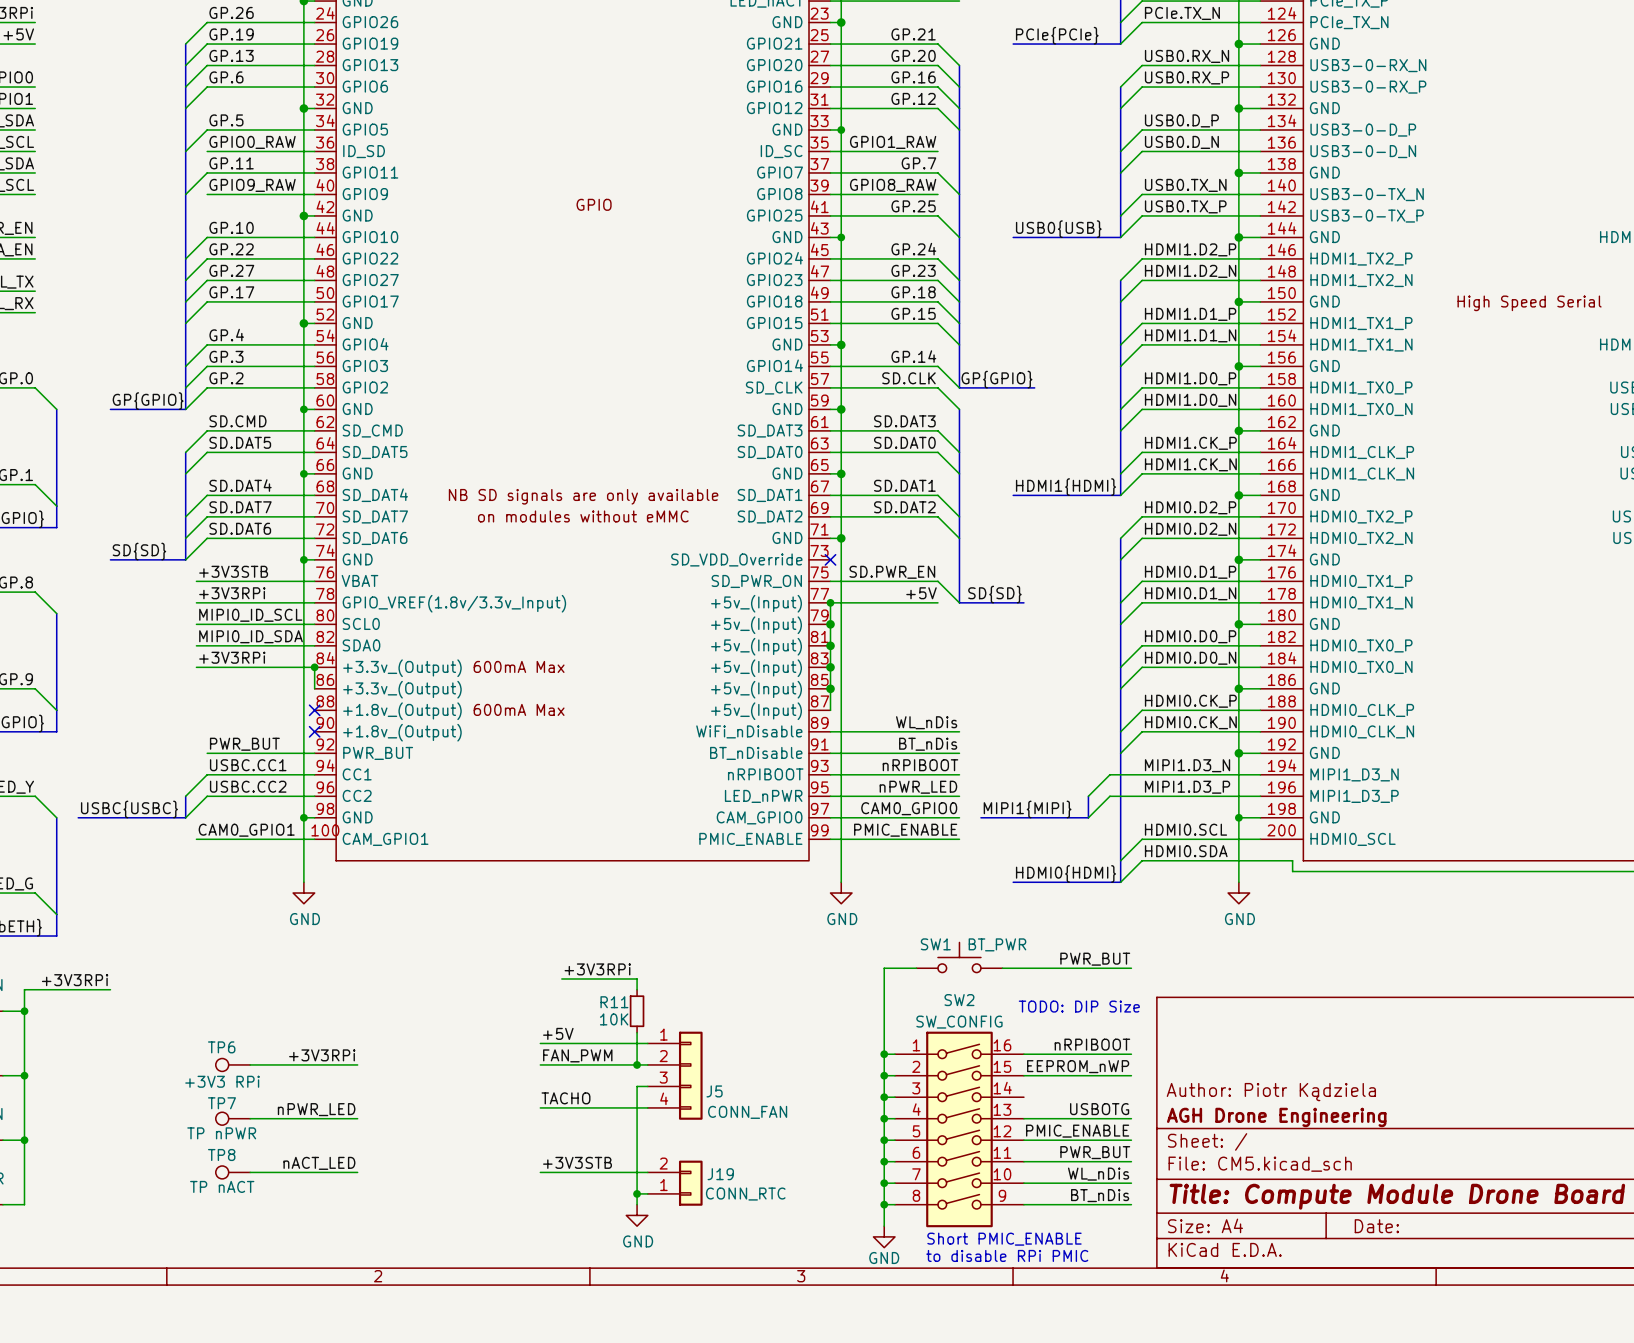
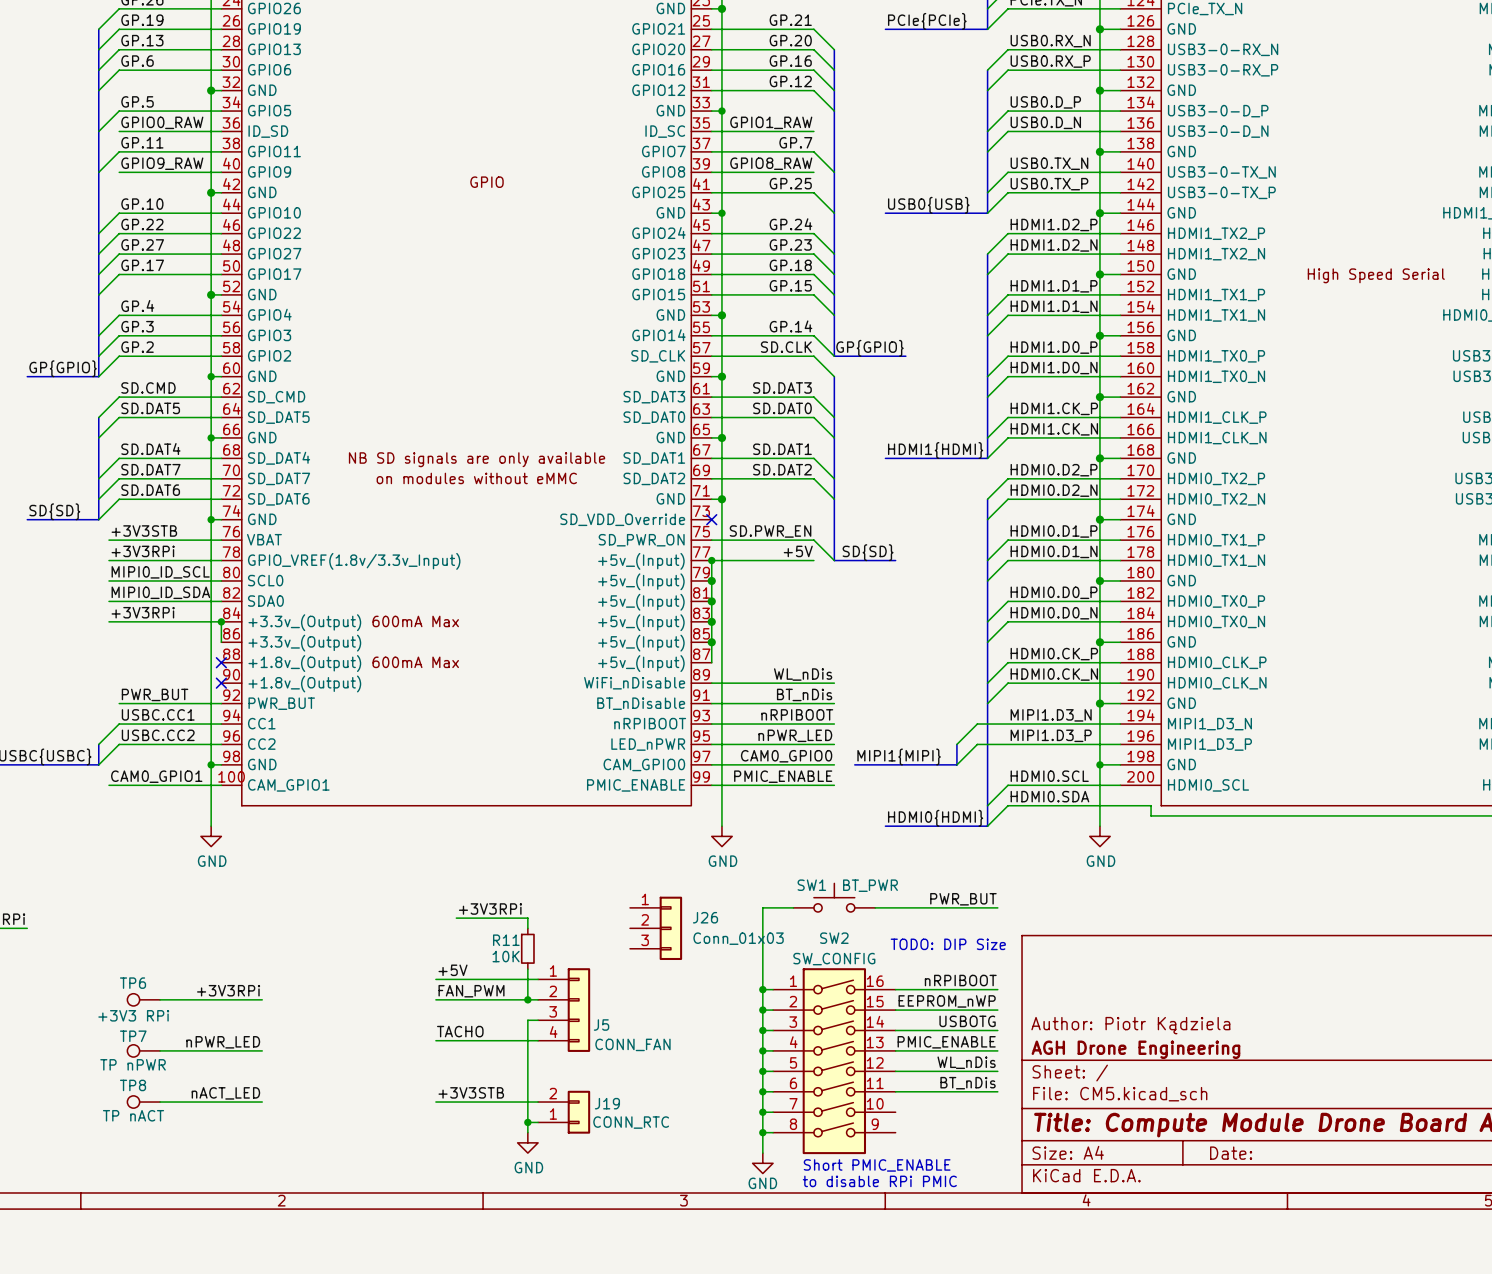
J26: none -> Conn_01x03 (656, 928)
label: none -> USBOTG (967, 1021)
label: USBOTG (1099, 1109) -> PMIC_ENABLE (946, 1042)
label: PMIC_ENABLE (1077, 1131) -> WL_nDis (966, 1062)
label: PWR_BUT (1095, 1152) -> BT_nDis (968, 1083)
label: WL_nDis (1098, 1174) -> none
wire: (1023, 1183) (1131, 1183) -> (895, 1030) (997, 1030)
label: BT_nDis (1100, 1195) -> none
wire: (1023, 1204) (1131, 1204) -> none

